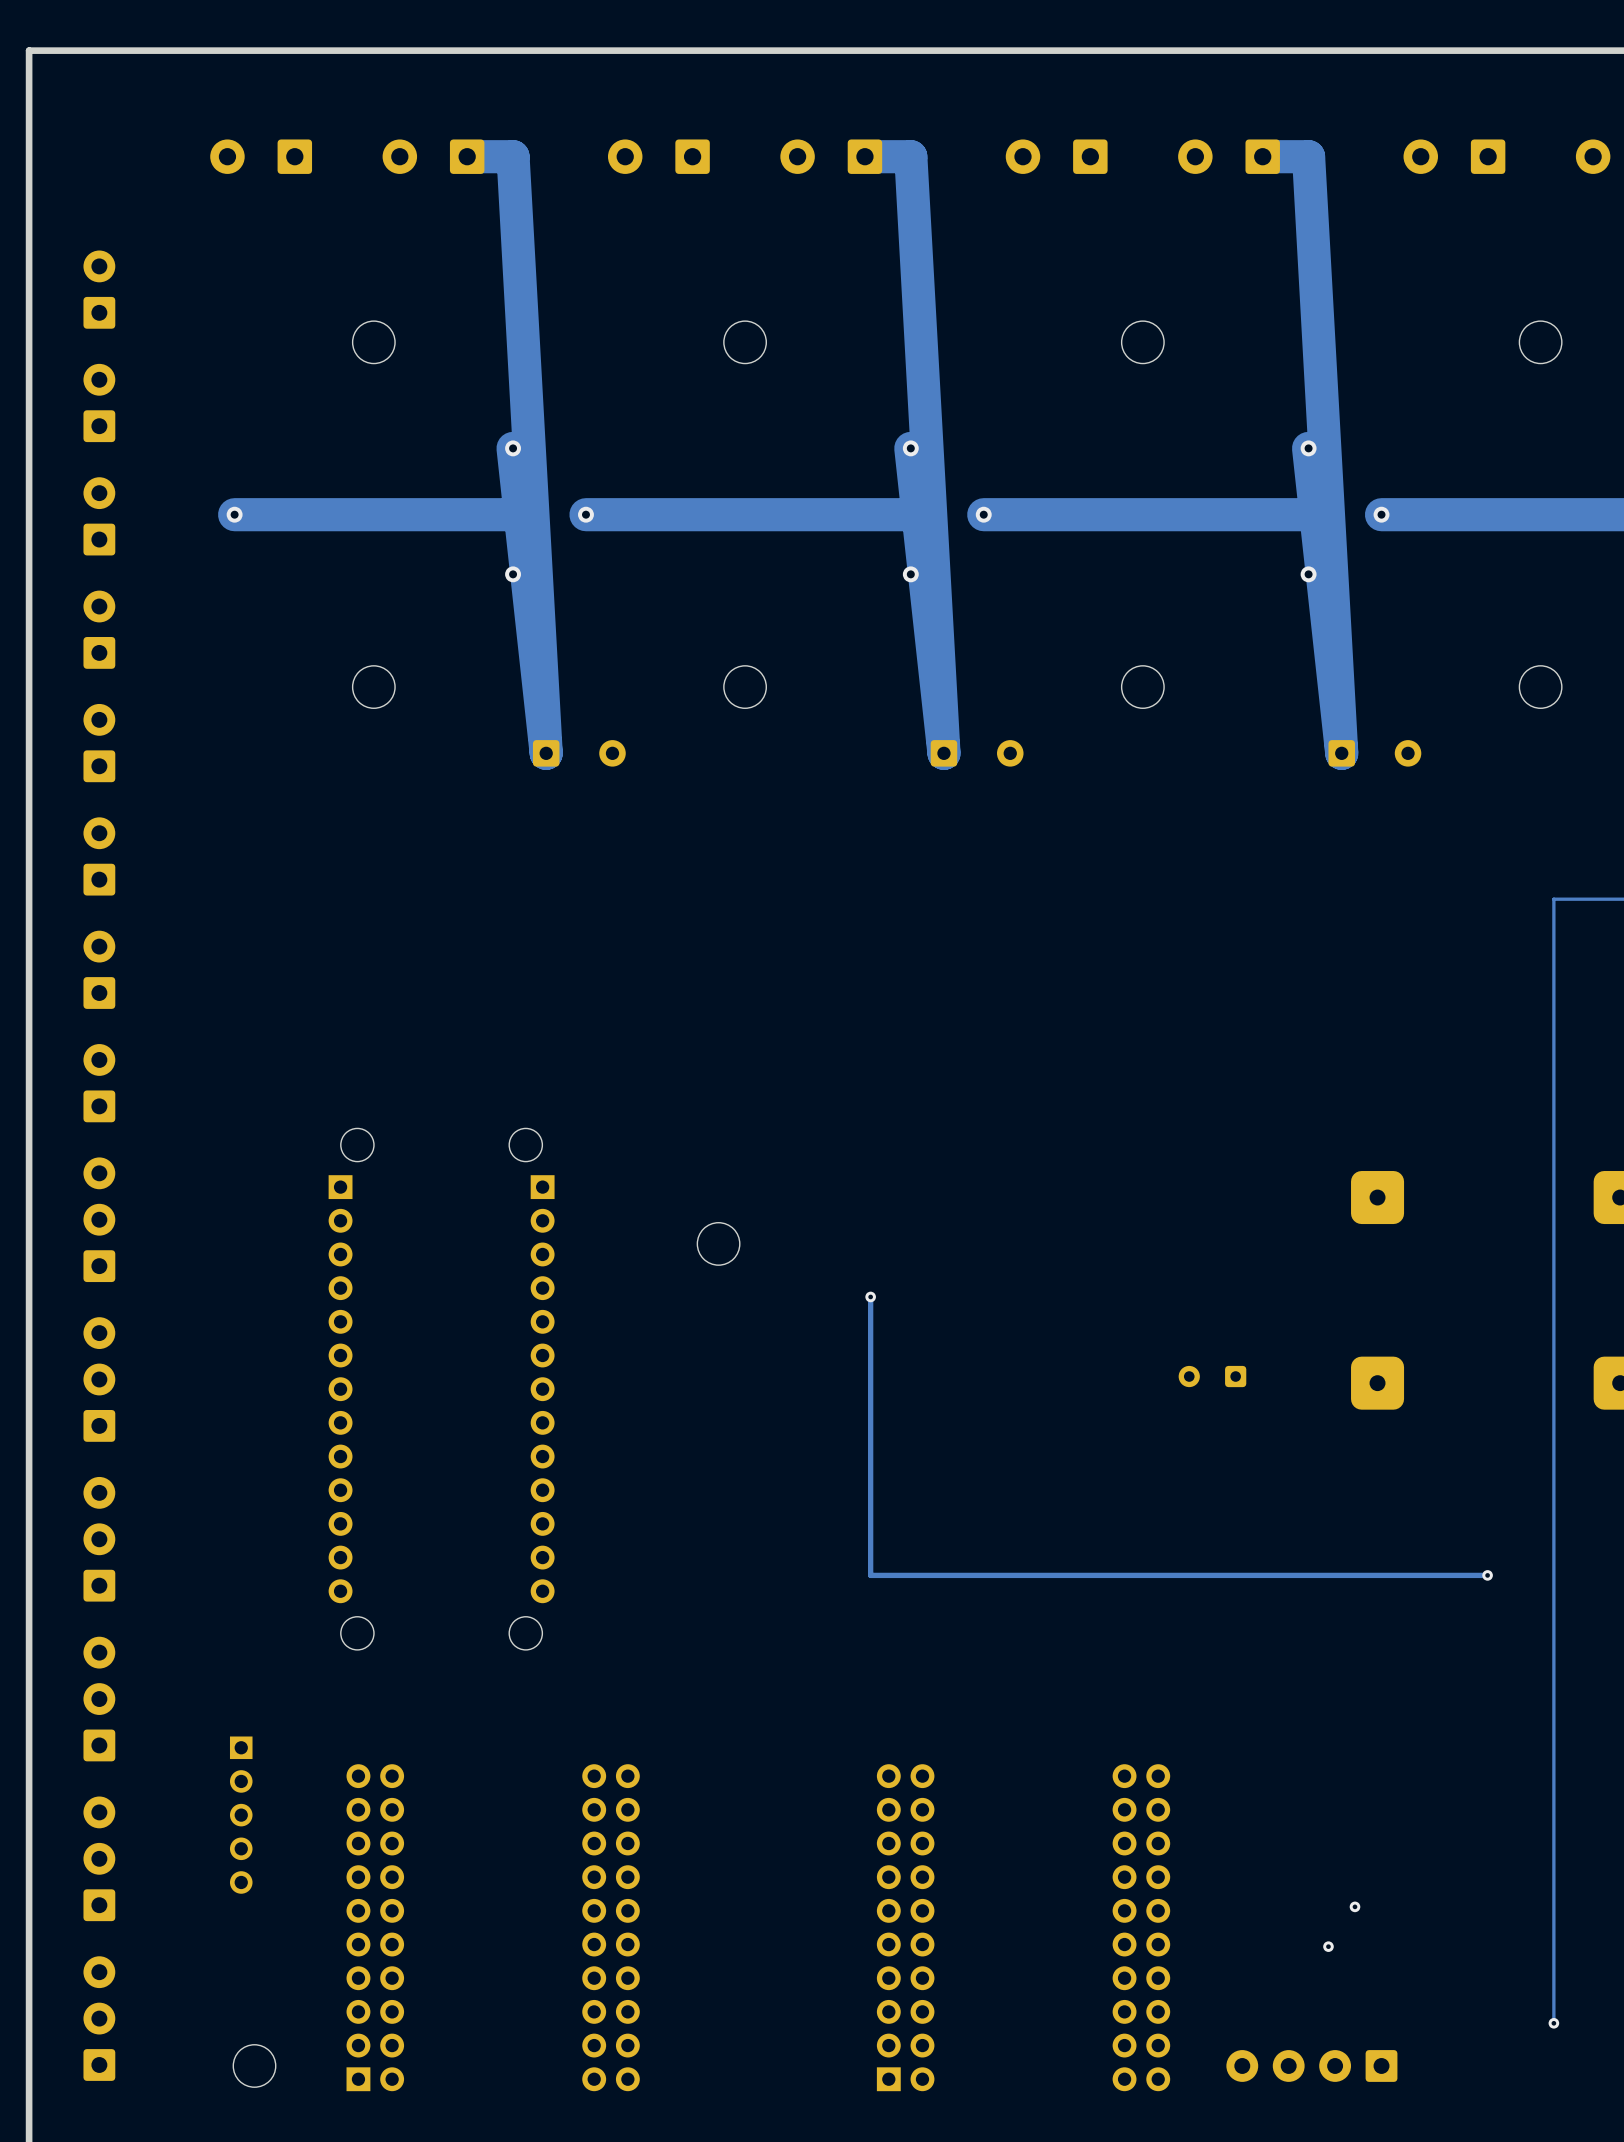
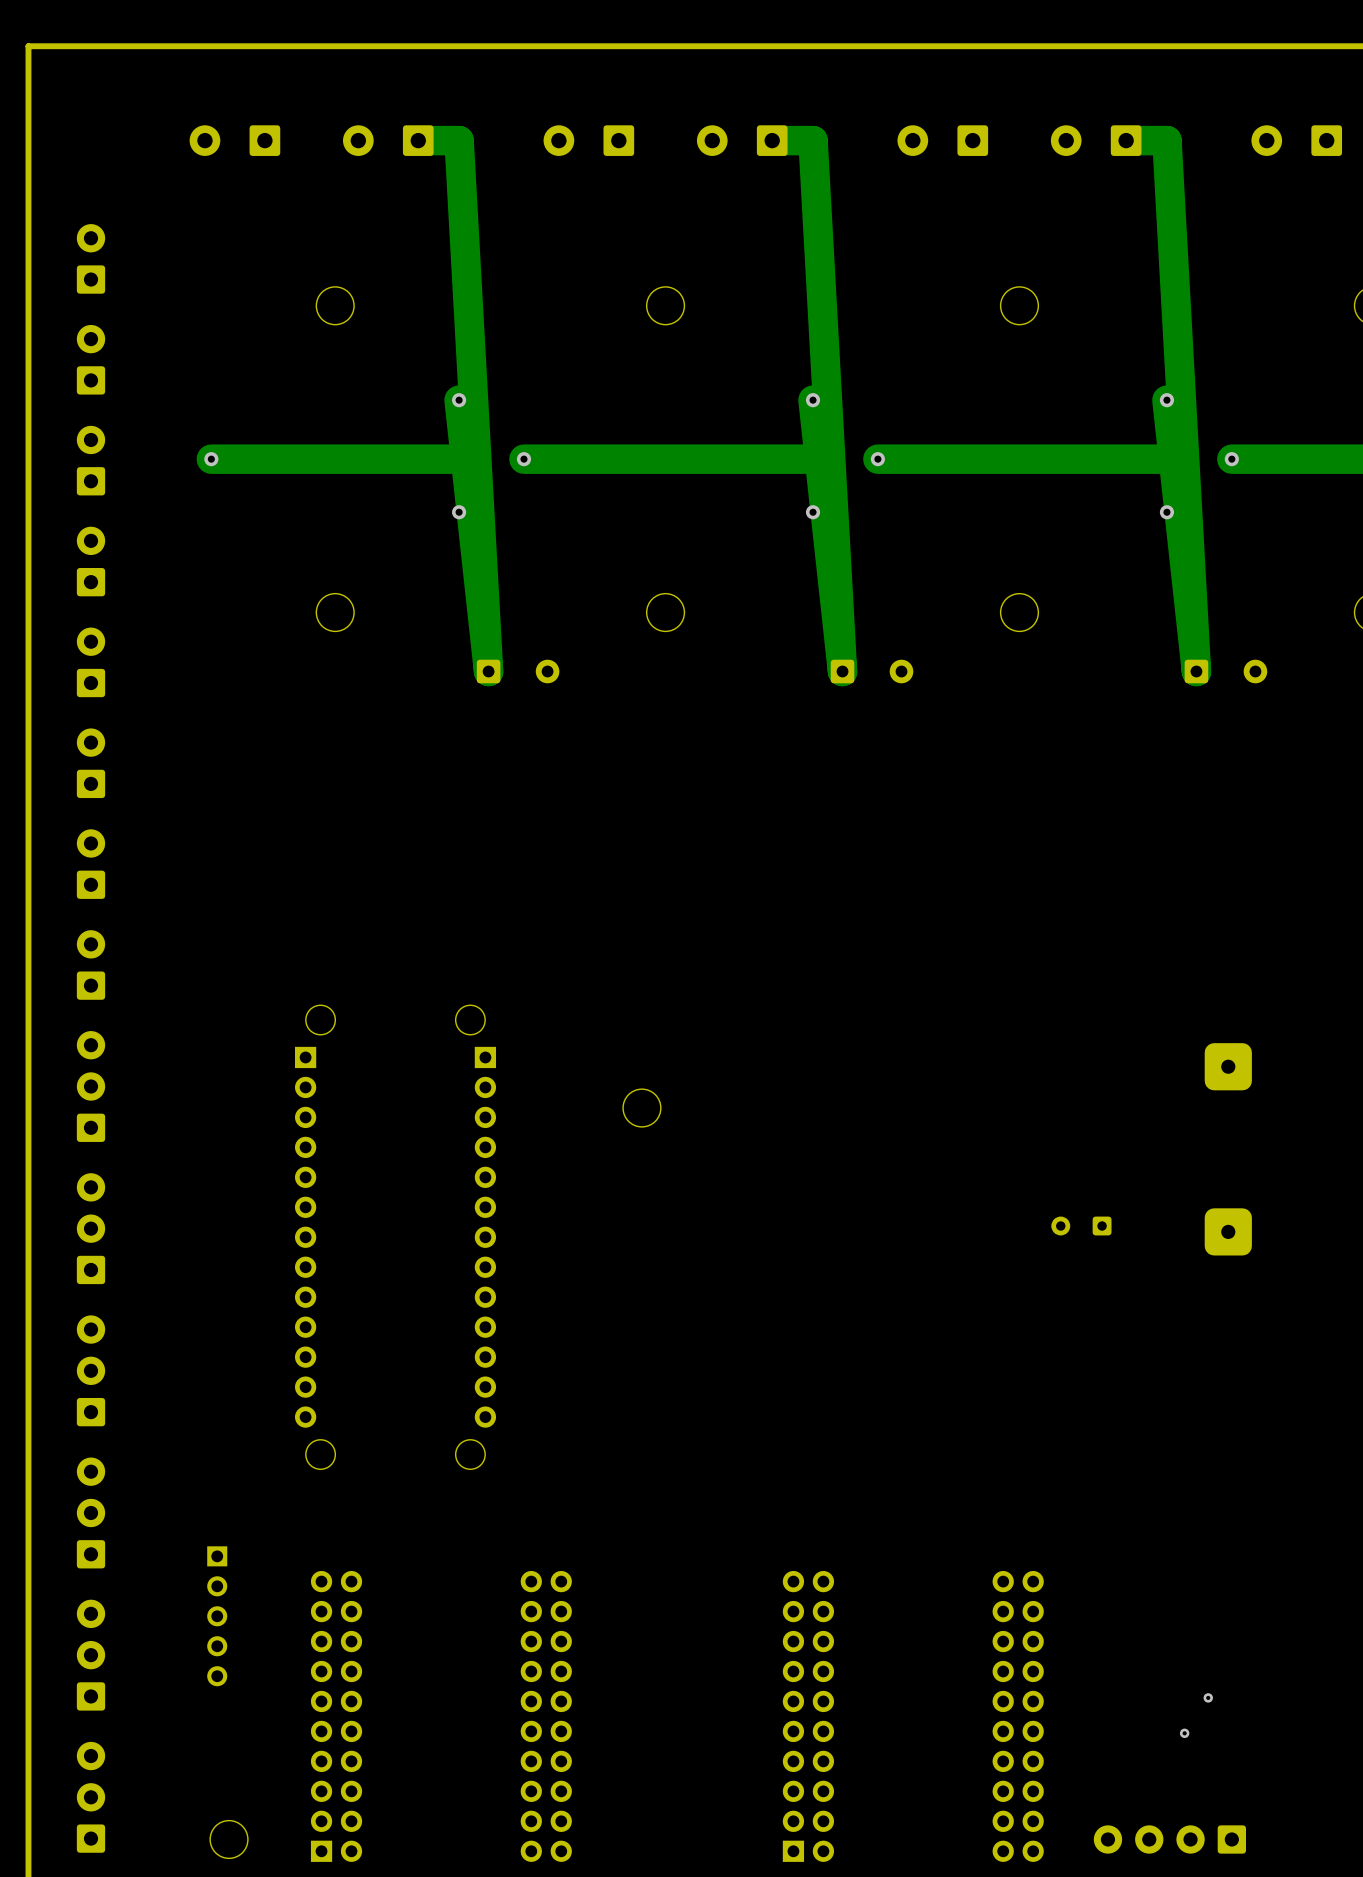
track: (870, 1296) (870, 1575) (1487, 1575) -> none
via: (870, 1296) -> none
via: (1487, 1575) -> none

